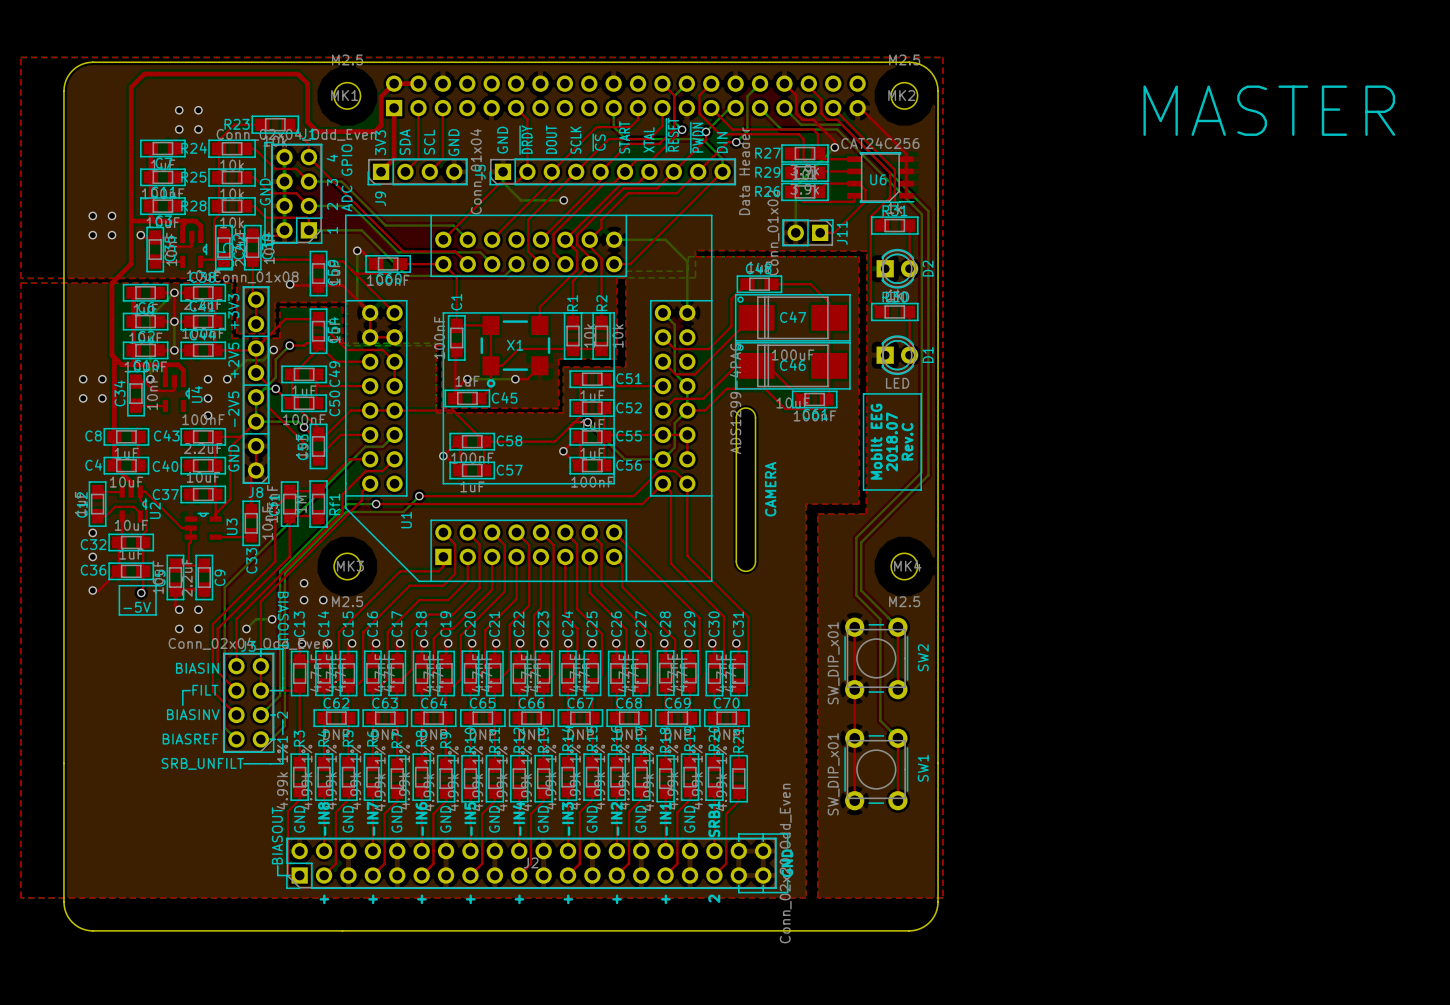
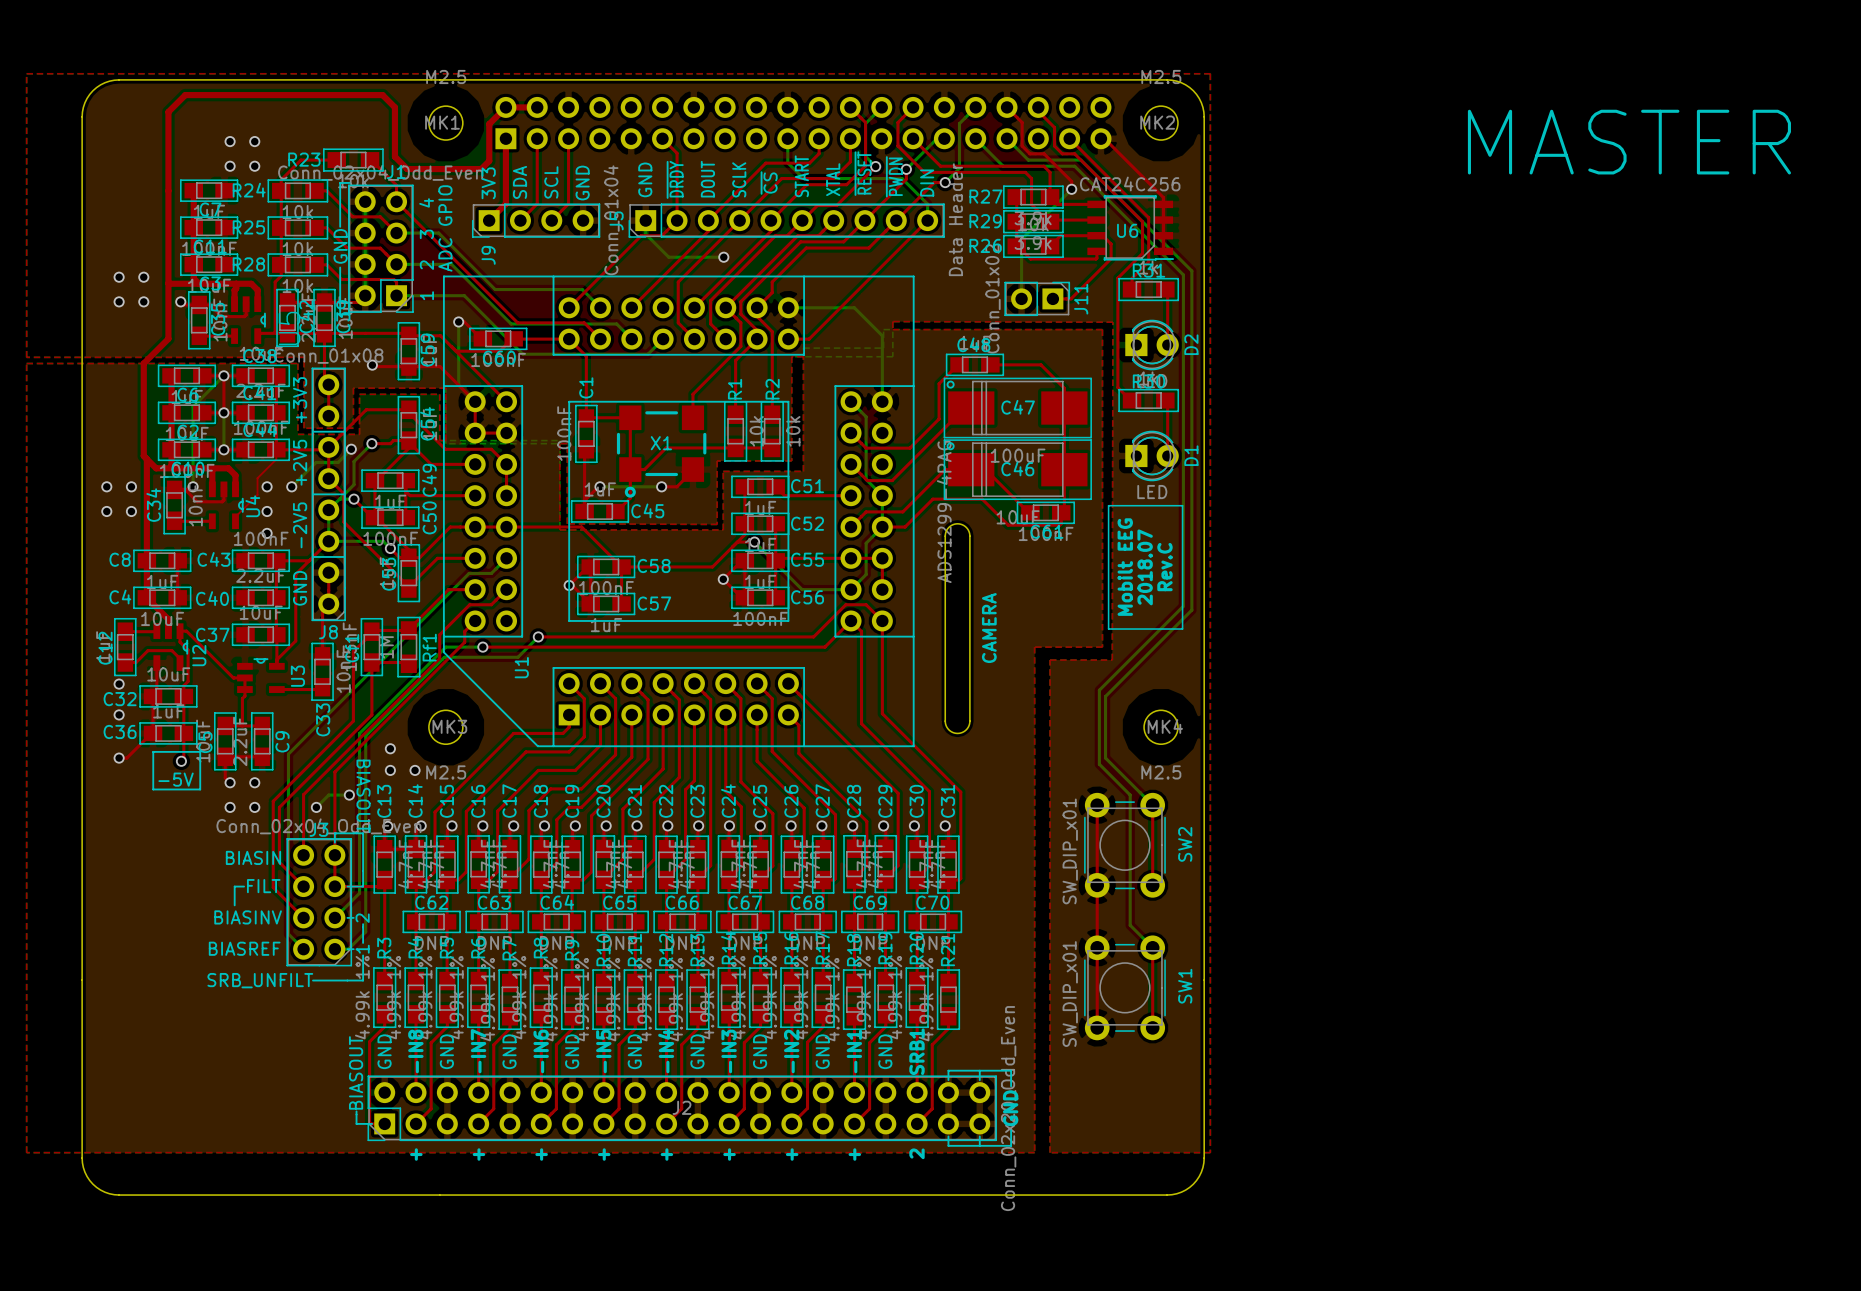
top track: none -> (276, 449) (276, 459) (257, 478) (257, 494) (235, 516) (235, 521)

